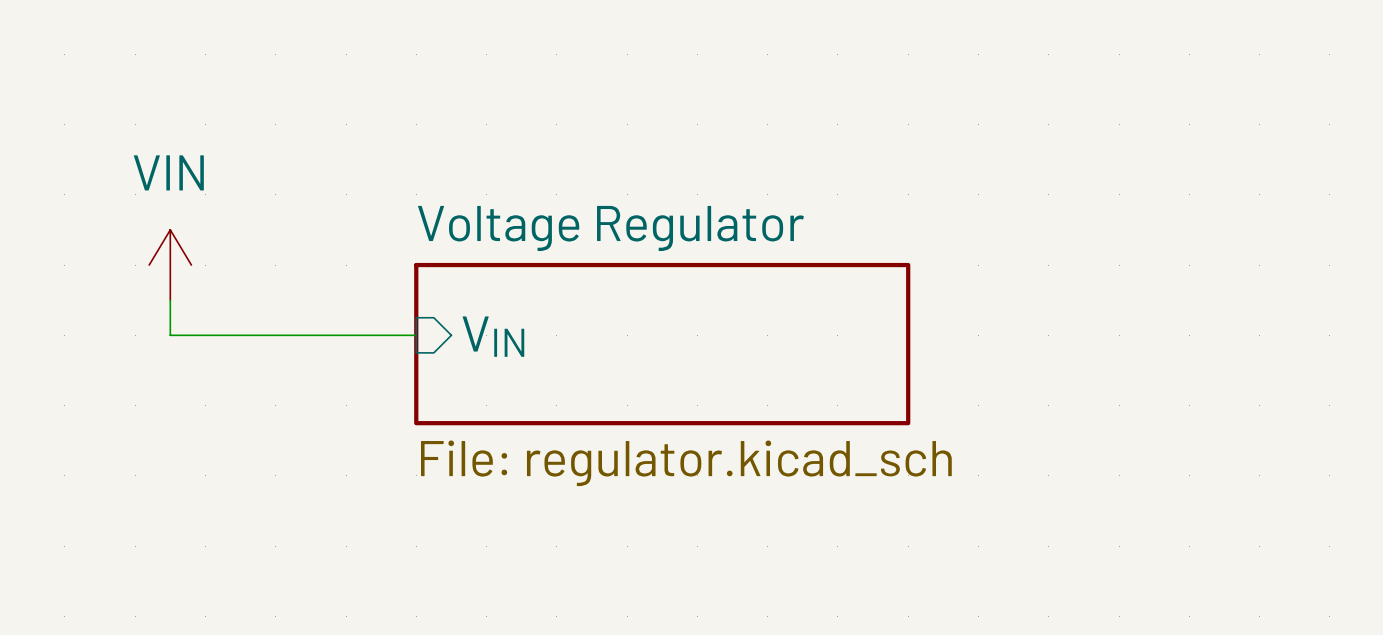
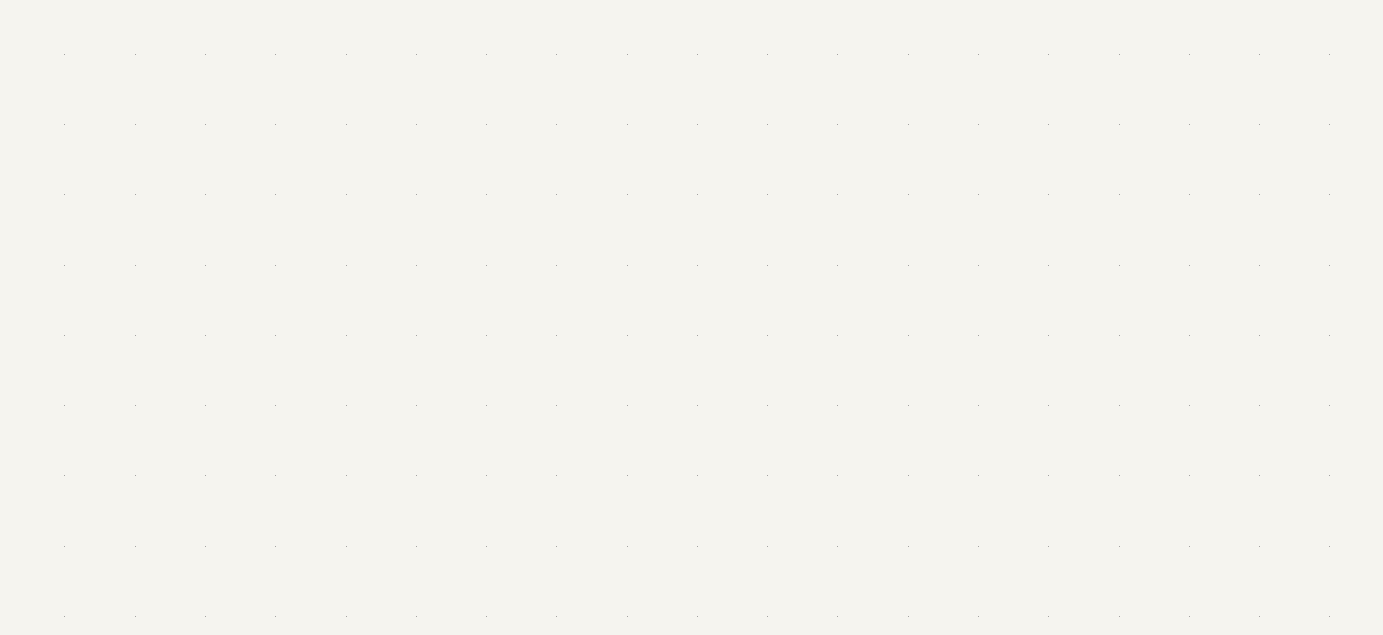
power symbol: VIN (170, 265) -> none
wire: (170, 300) (170, 335) (416, 335) -> none
sheet pin: VIN (493, 336) -> none
sheet Voltage Regulator: File: regulator.kicad_sch (662, 344) -> none

